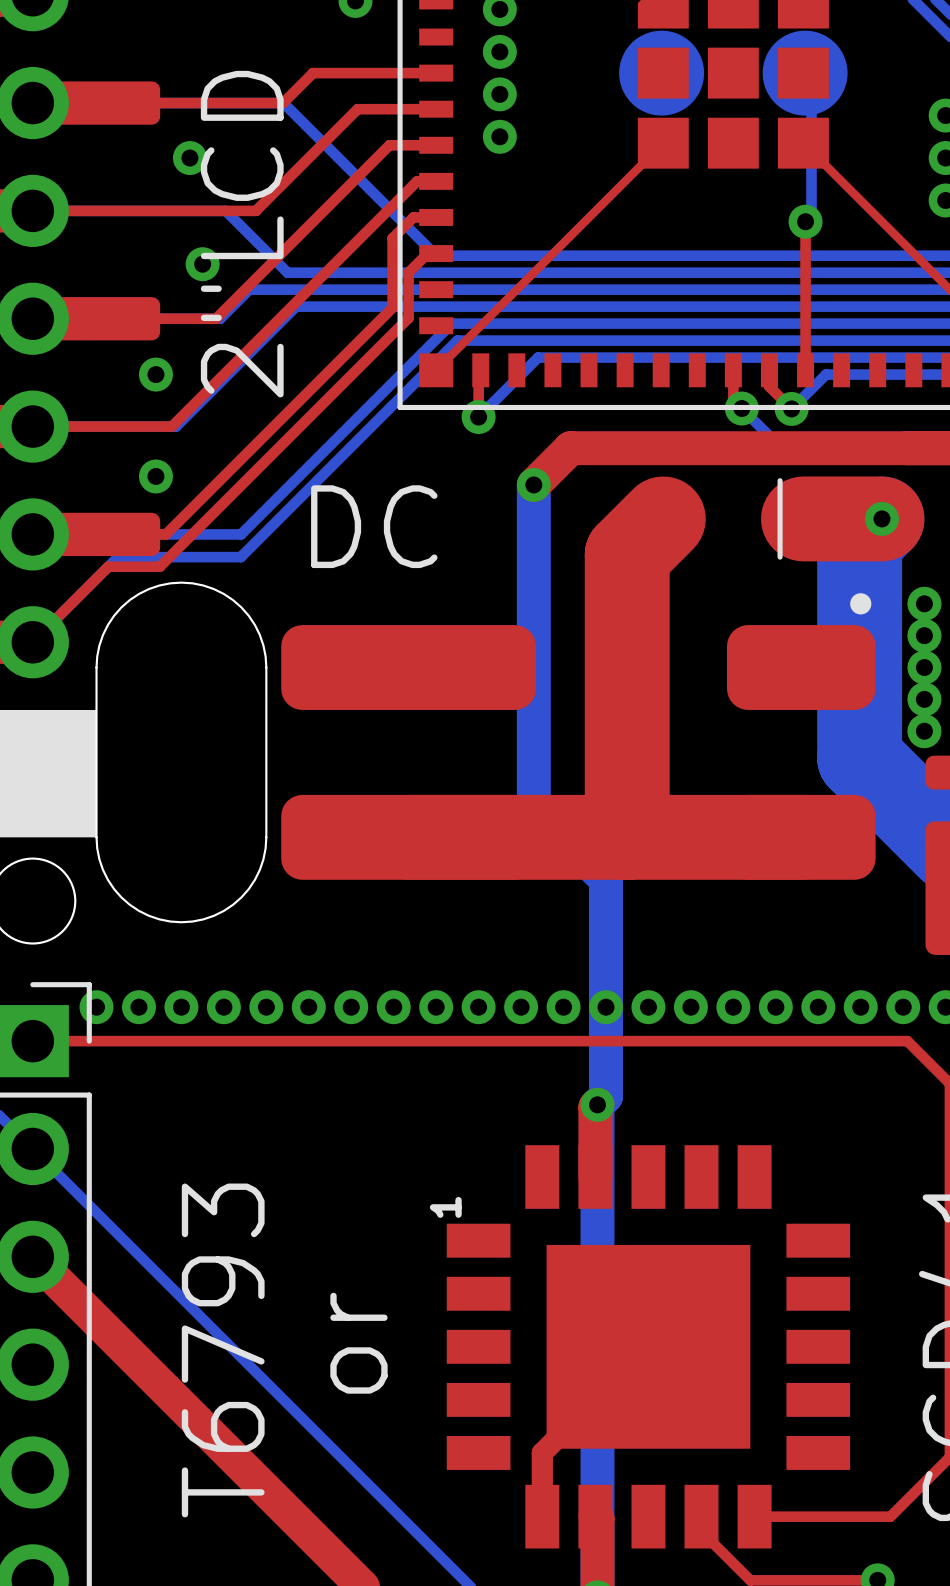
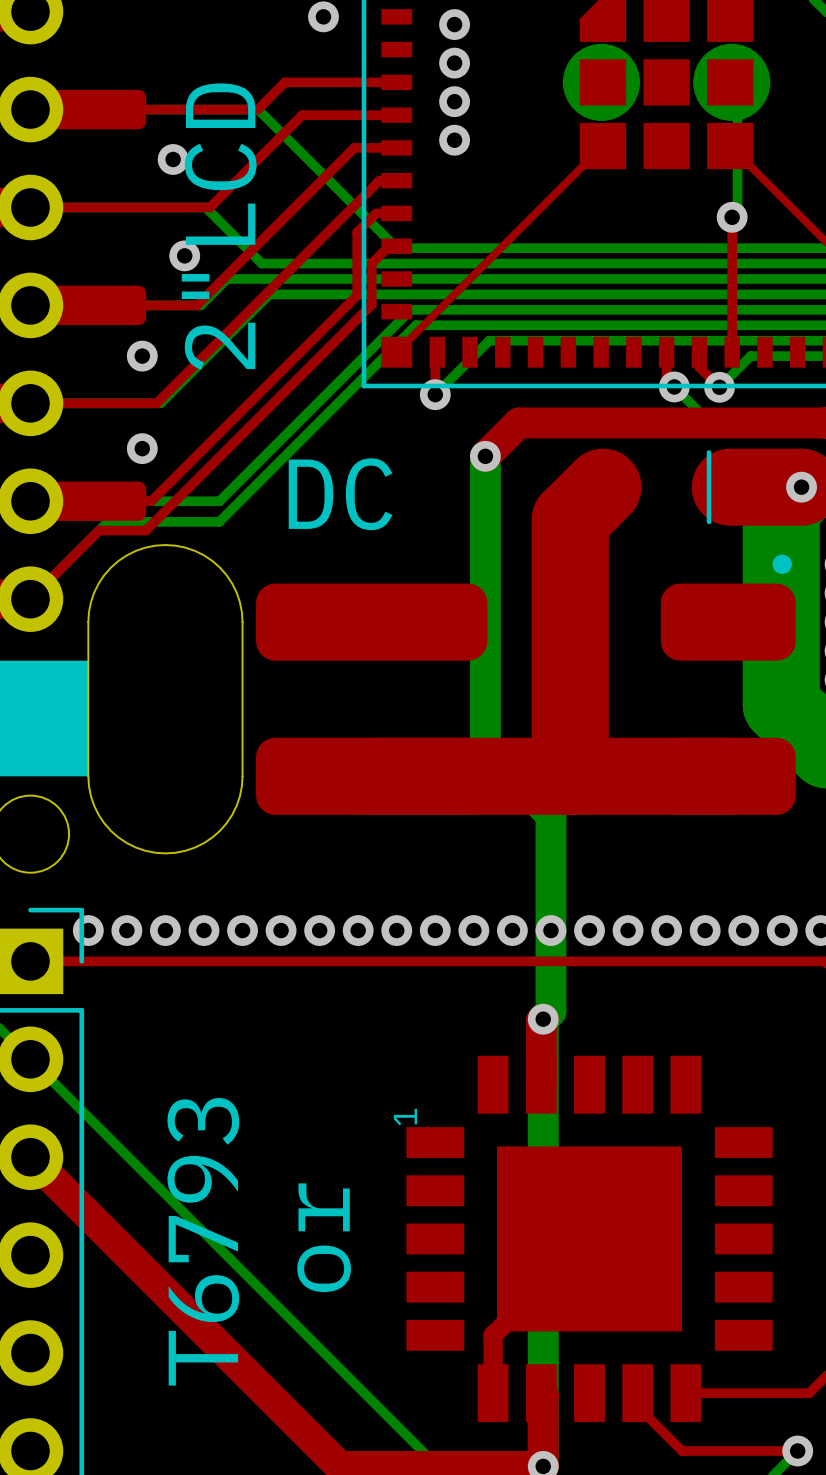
top track: (357, 109) (255, 210) (230, 210) -> (325, 115) (302, 115) (209, 207)

